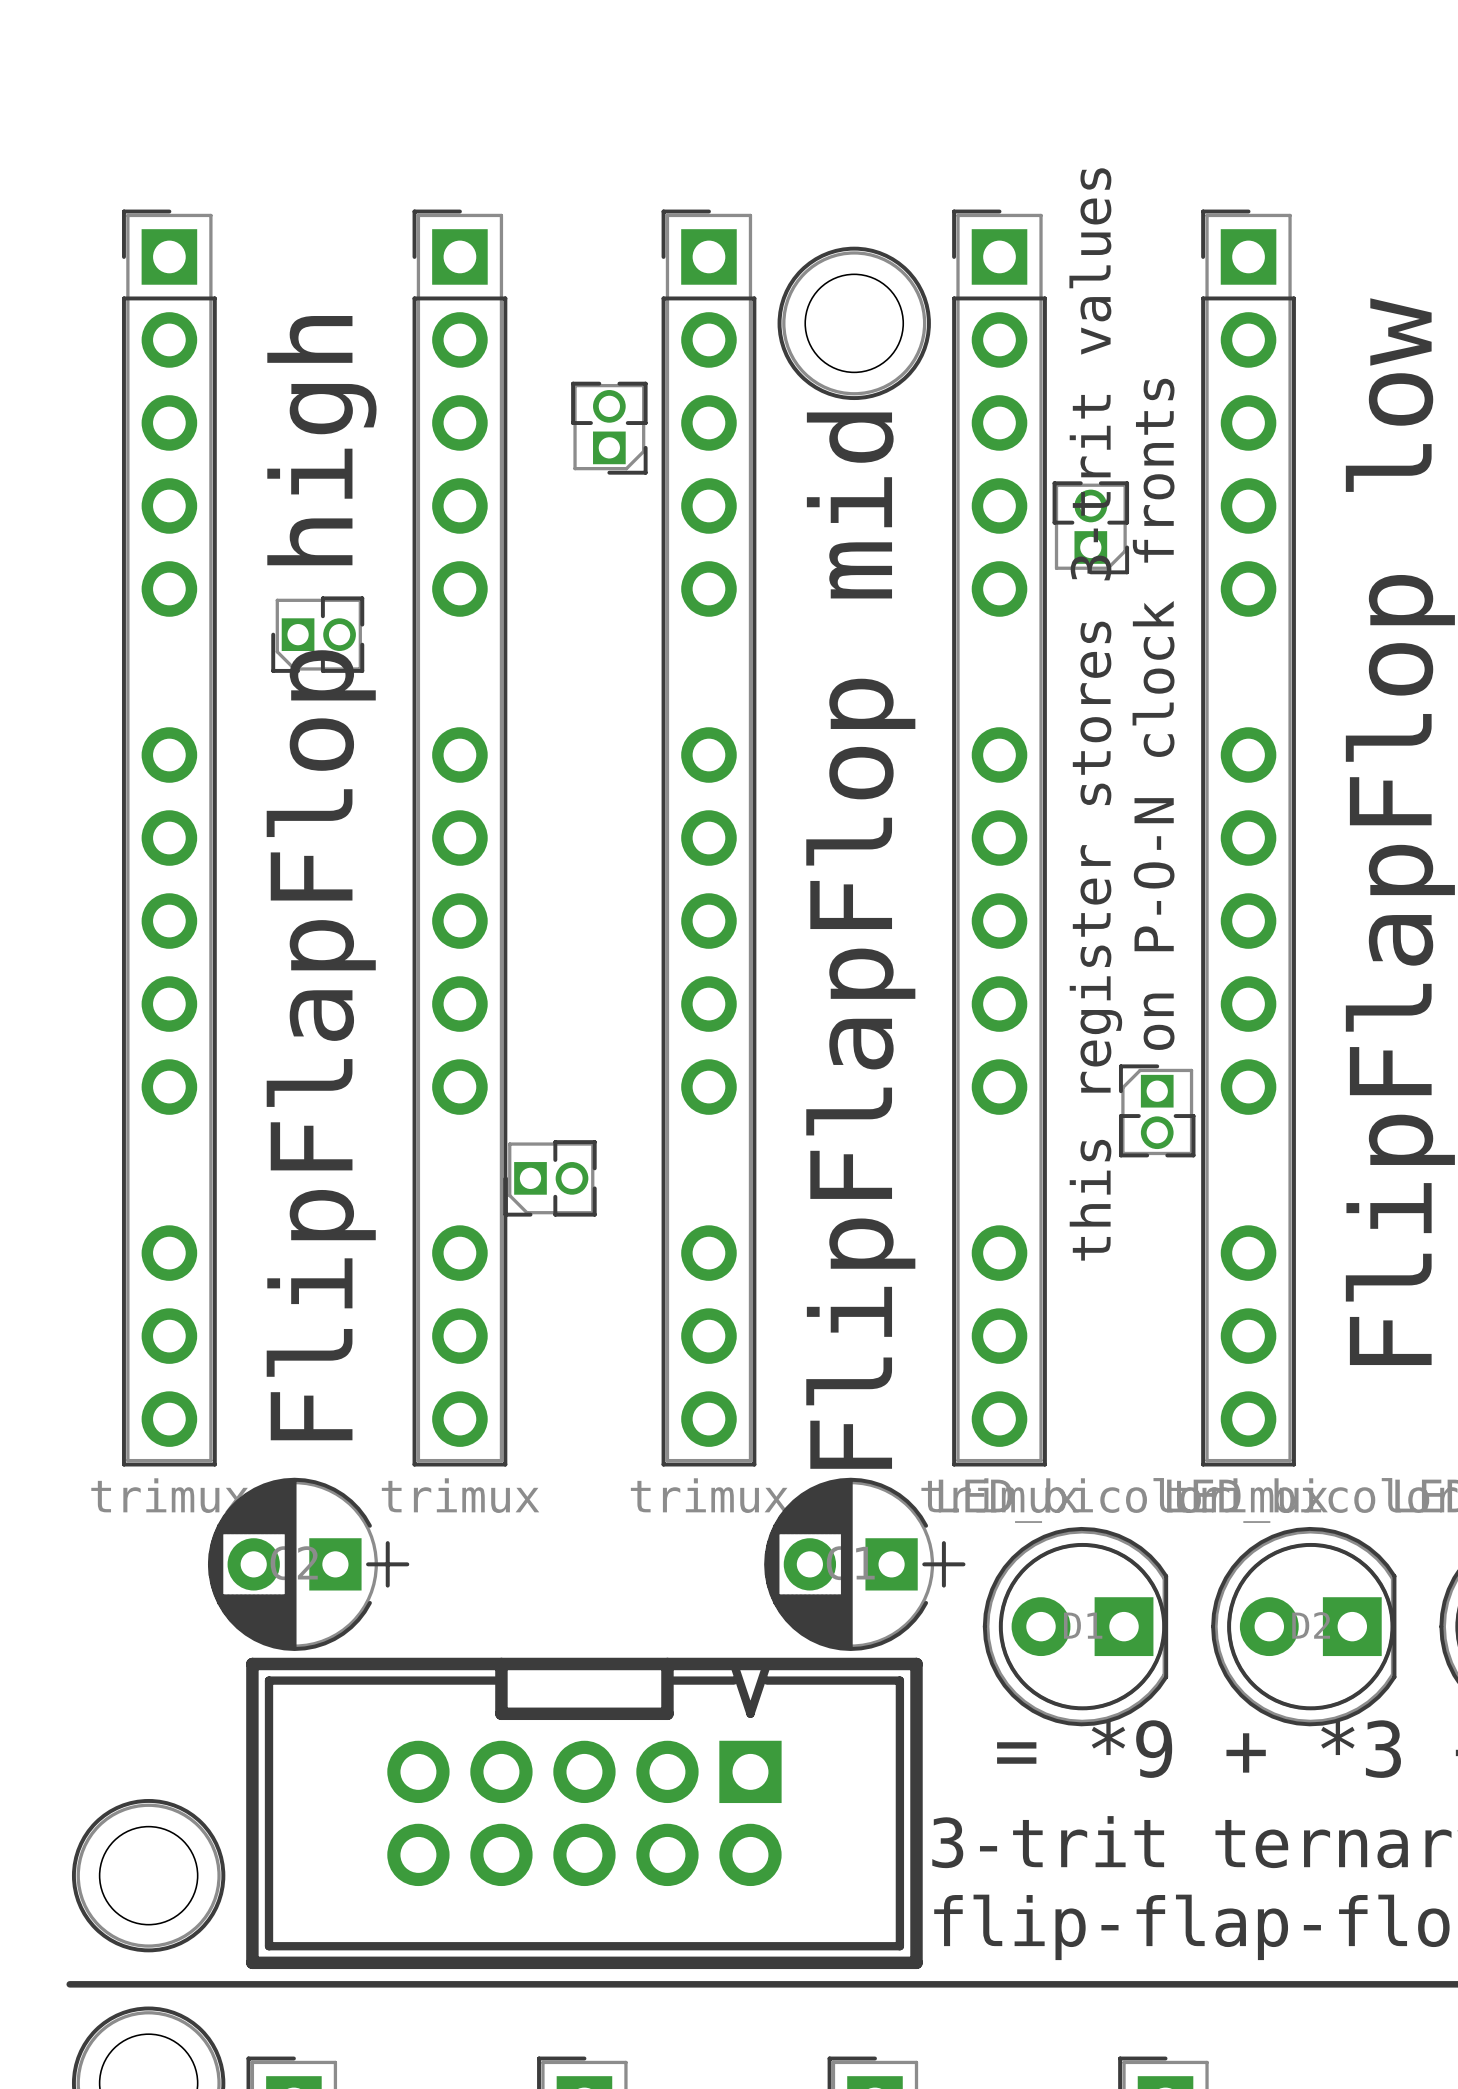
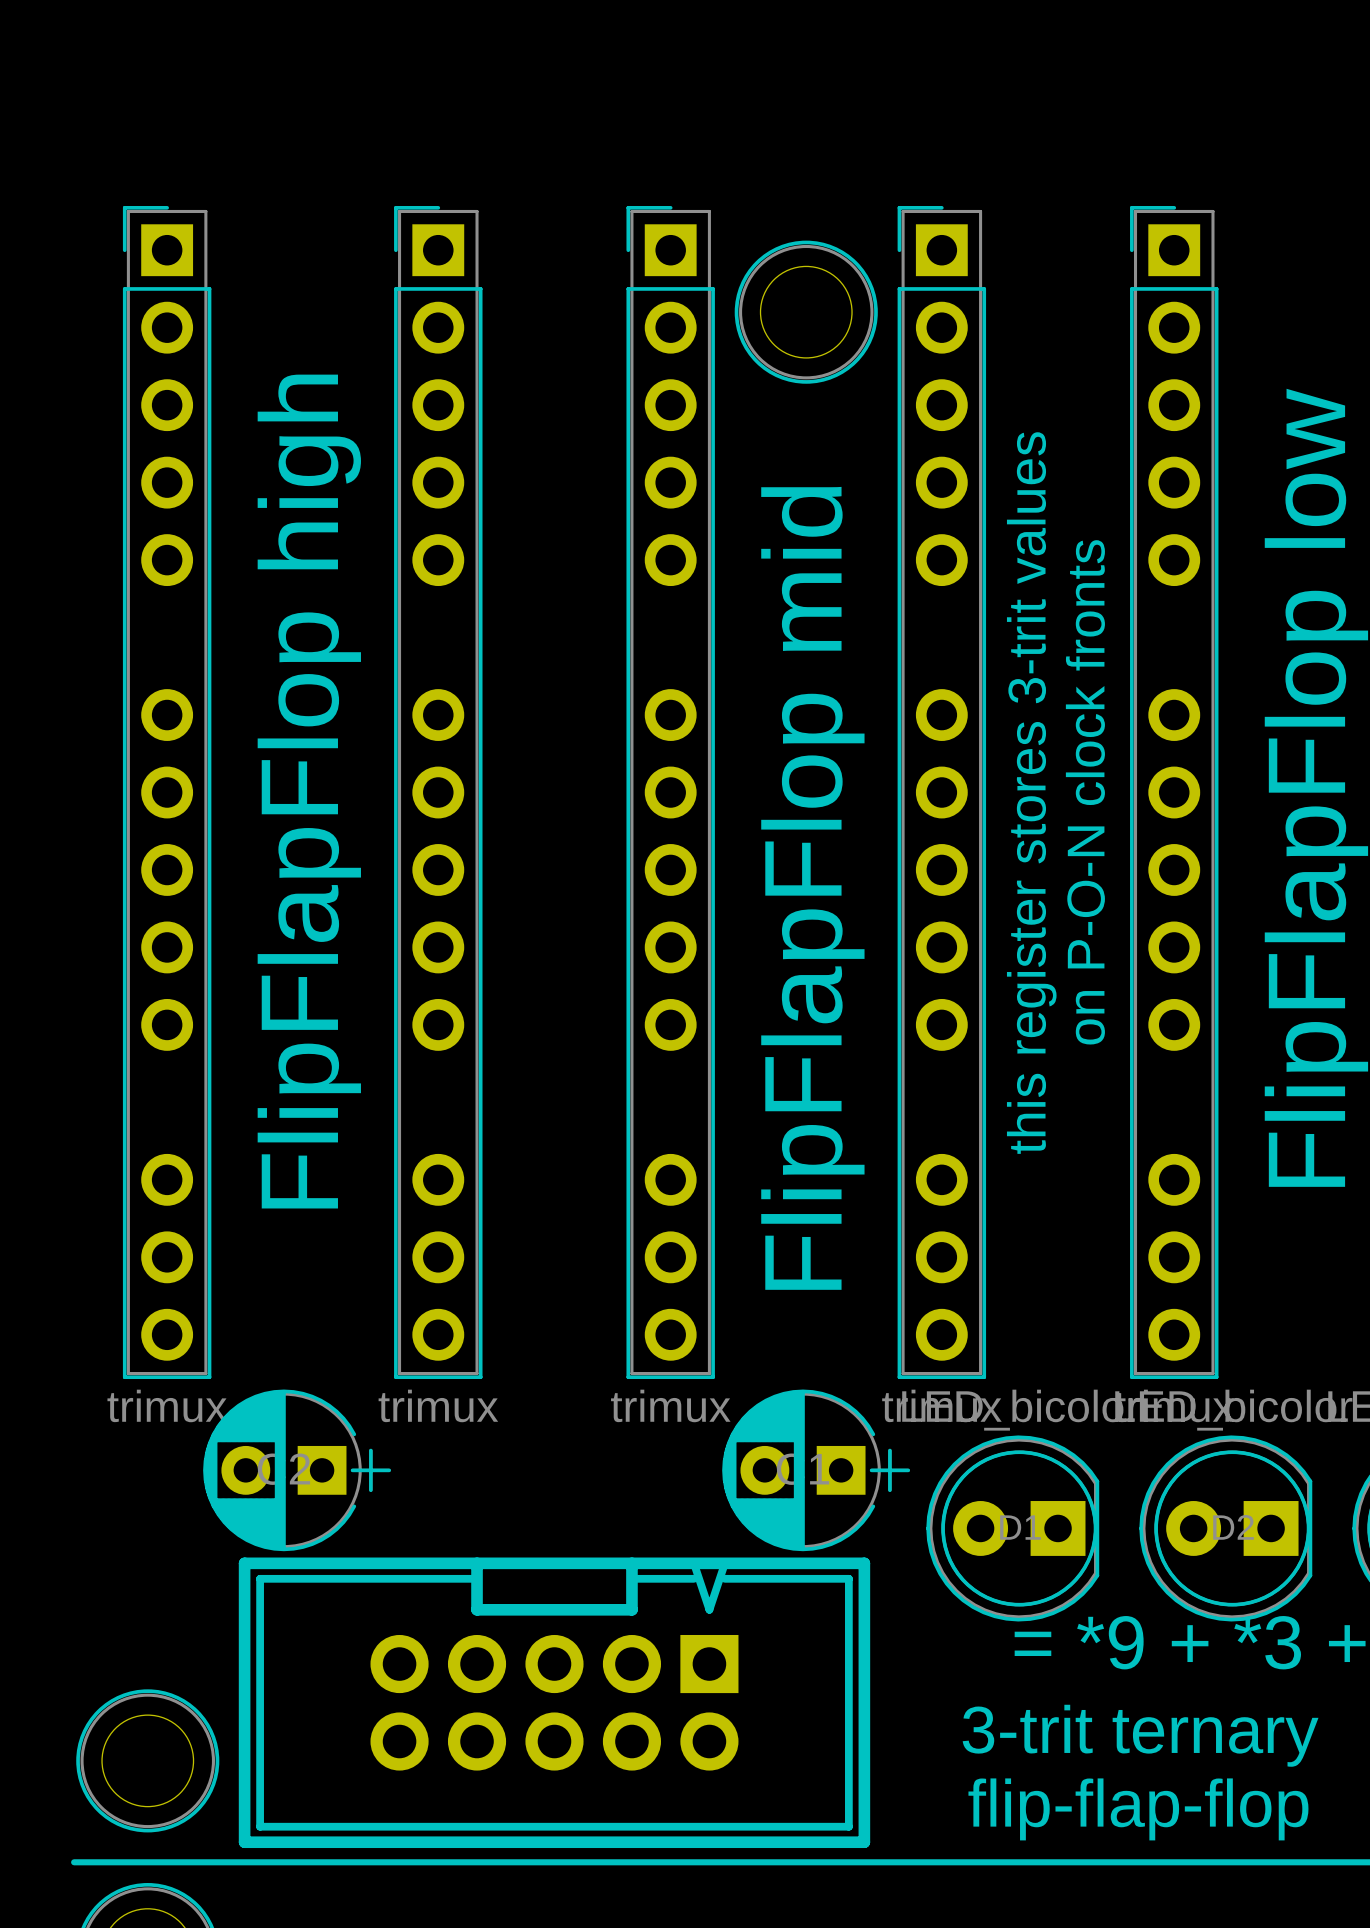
part: (609, 428) -> none
part: (1090, 527) -> none
part: (317, 634) -> none
text position: this register stores 3-trit values (1095, 714) -> this register stores 3-trit values (1031, 793)
text position: on P-O-N clock fronts (1153, 714) -> on P-O-N clock fronts (1085, 792)
text position: FlipFlapFlop high (321, 878) -> FlipFlapFlop high (309, 791)
part: (1157, 1110) -> none
part: (550, 1178) -> none

